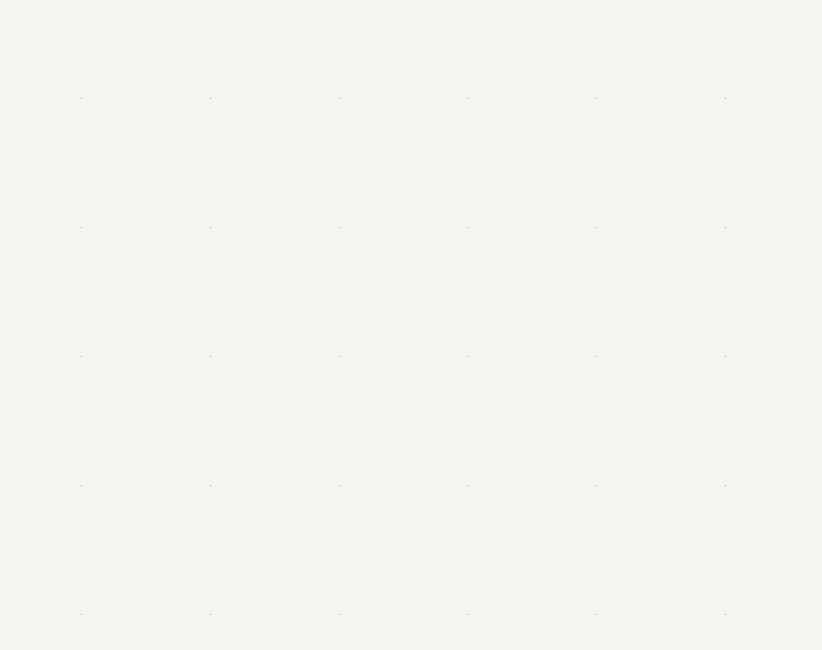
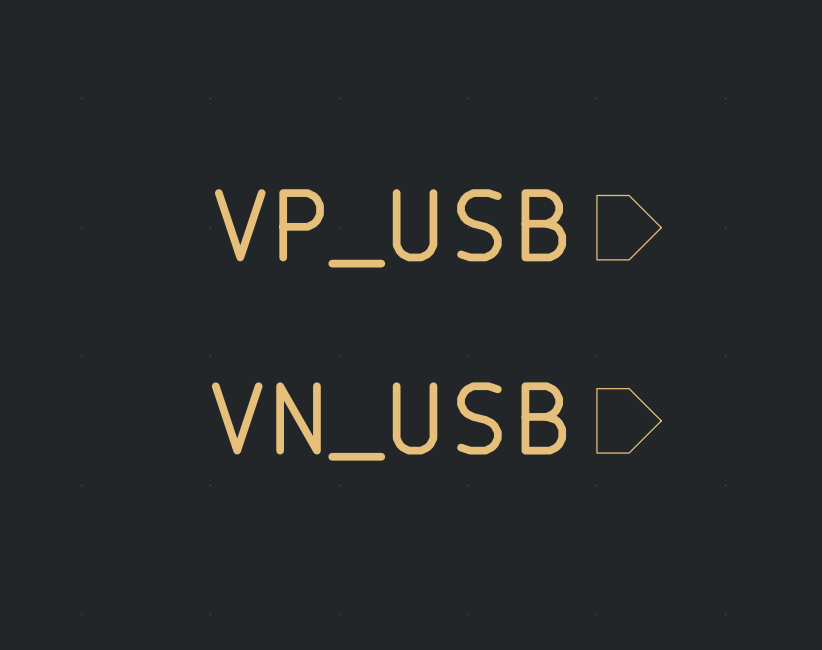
hierarchical label: none -> VP_USB (390, 228)
hierarchical label: none -> VN_USB (388, 421)

